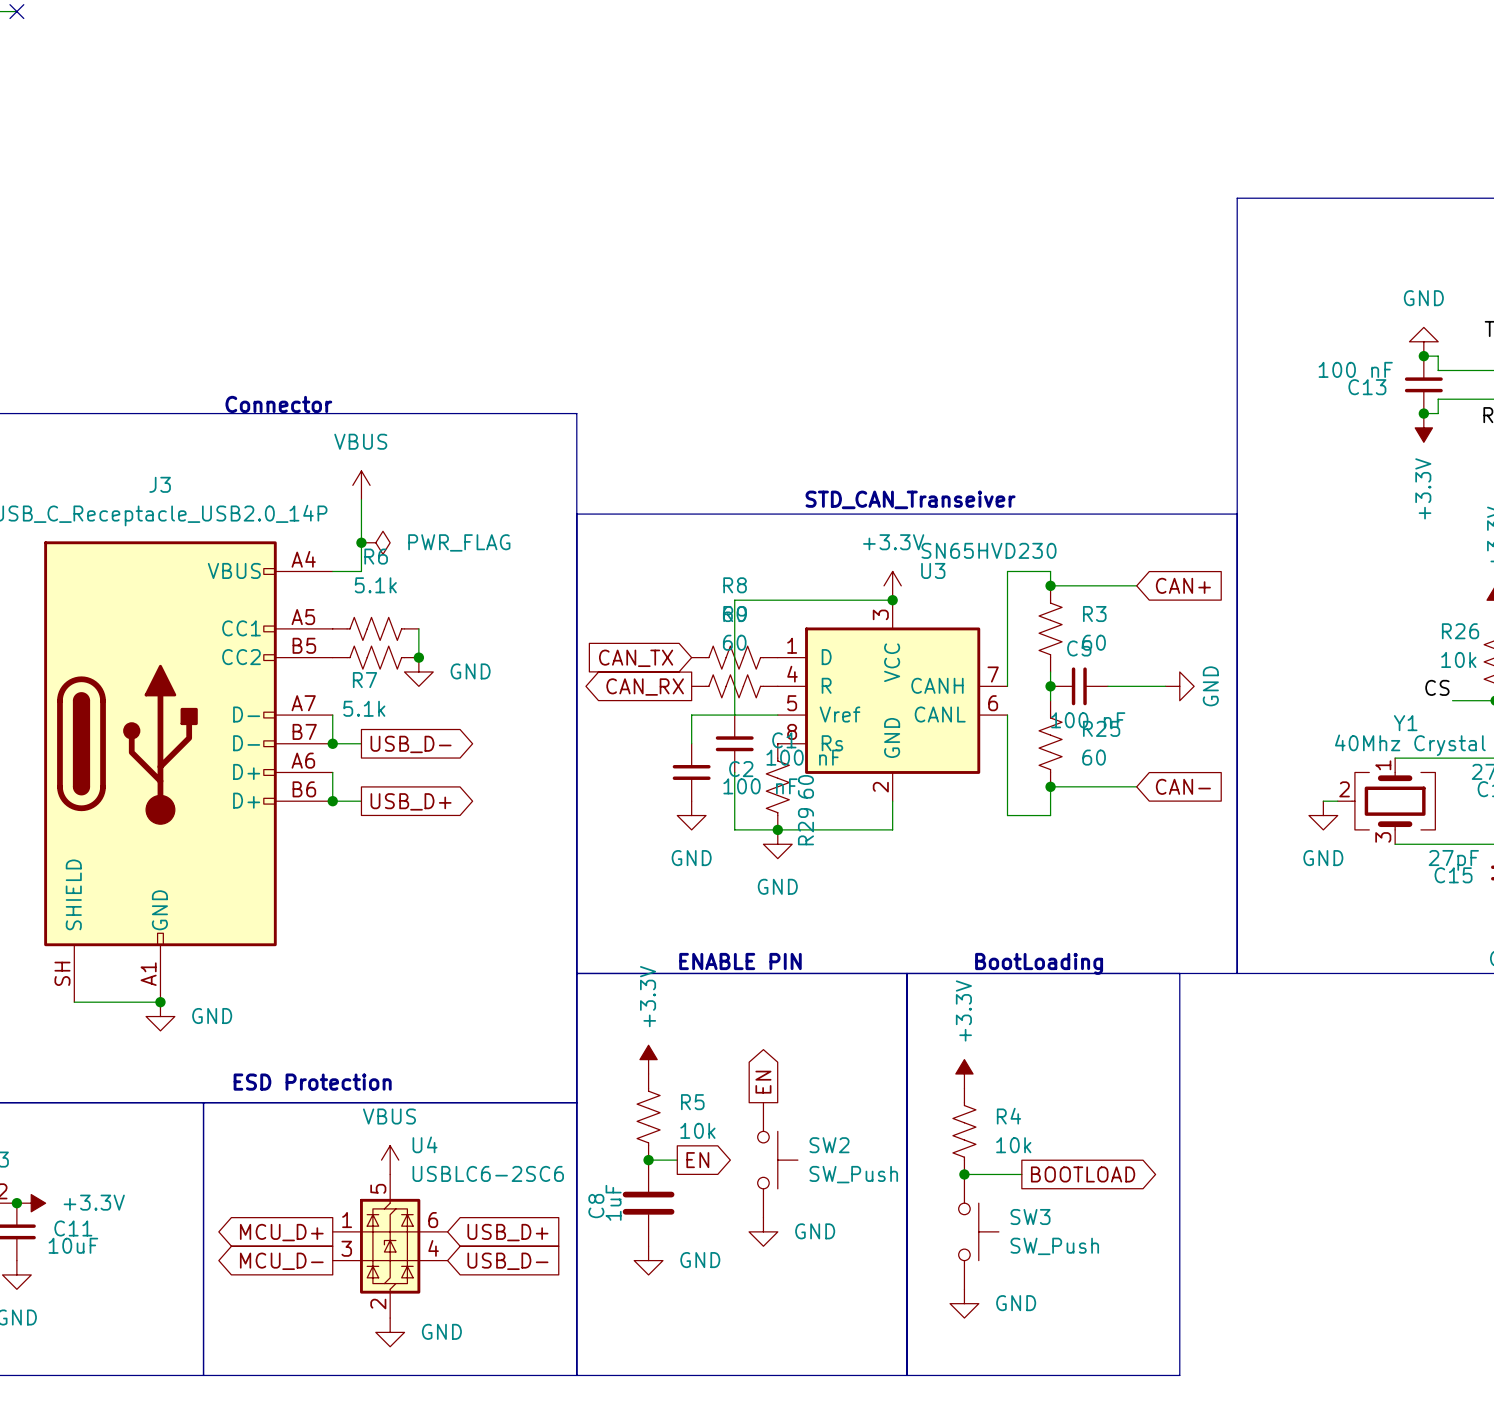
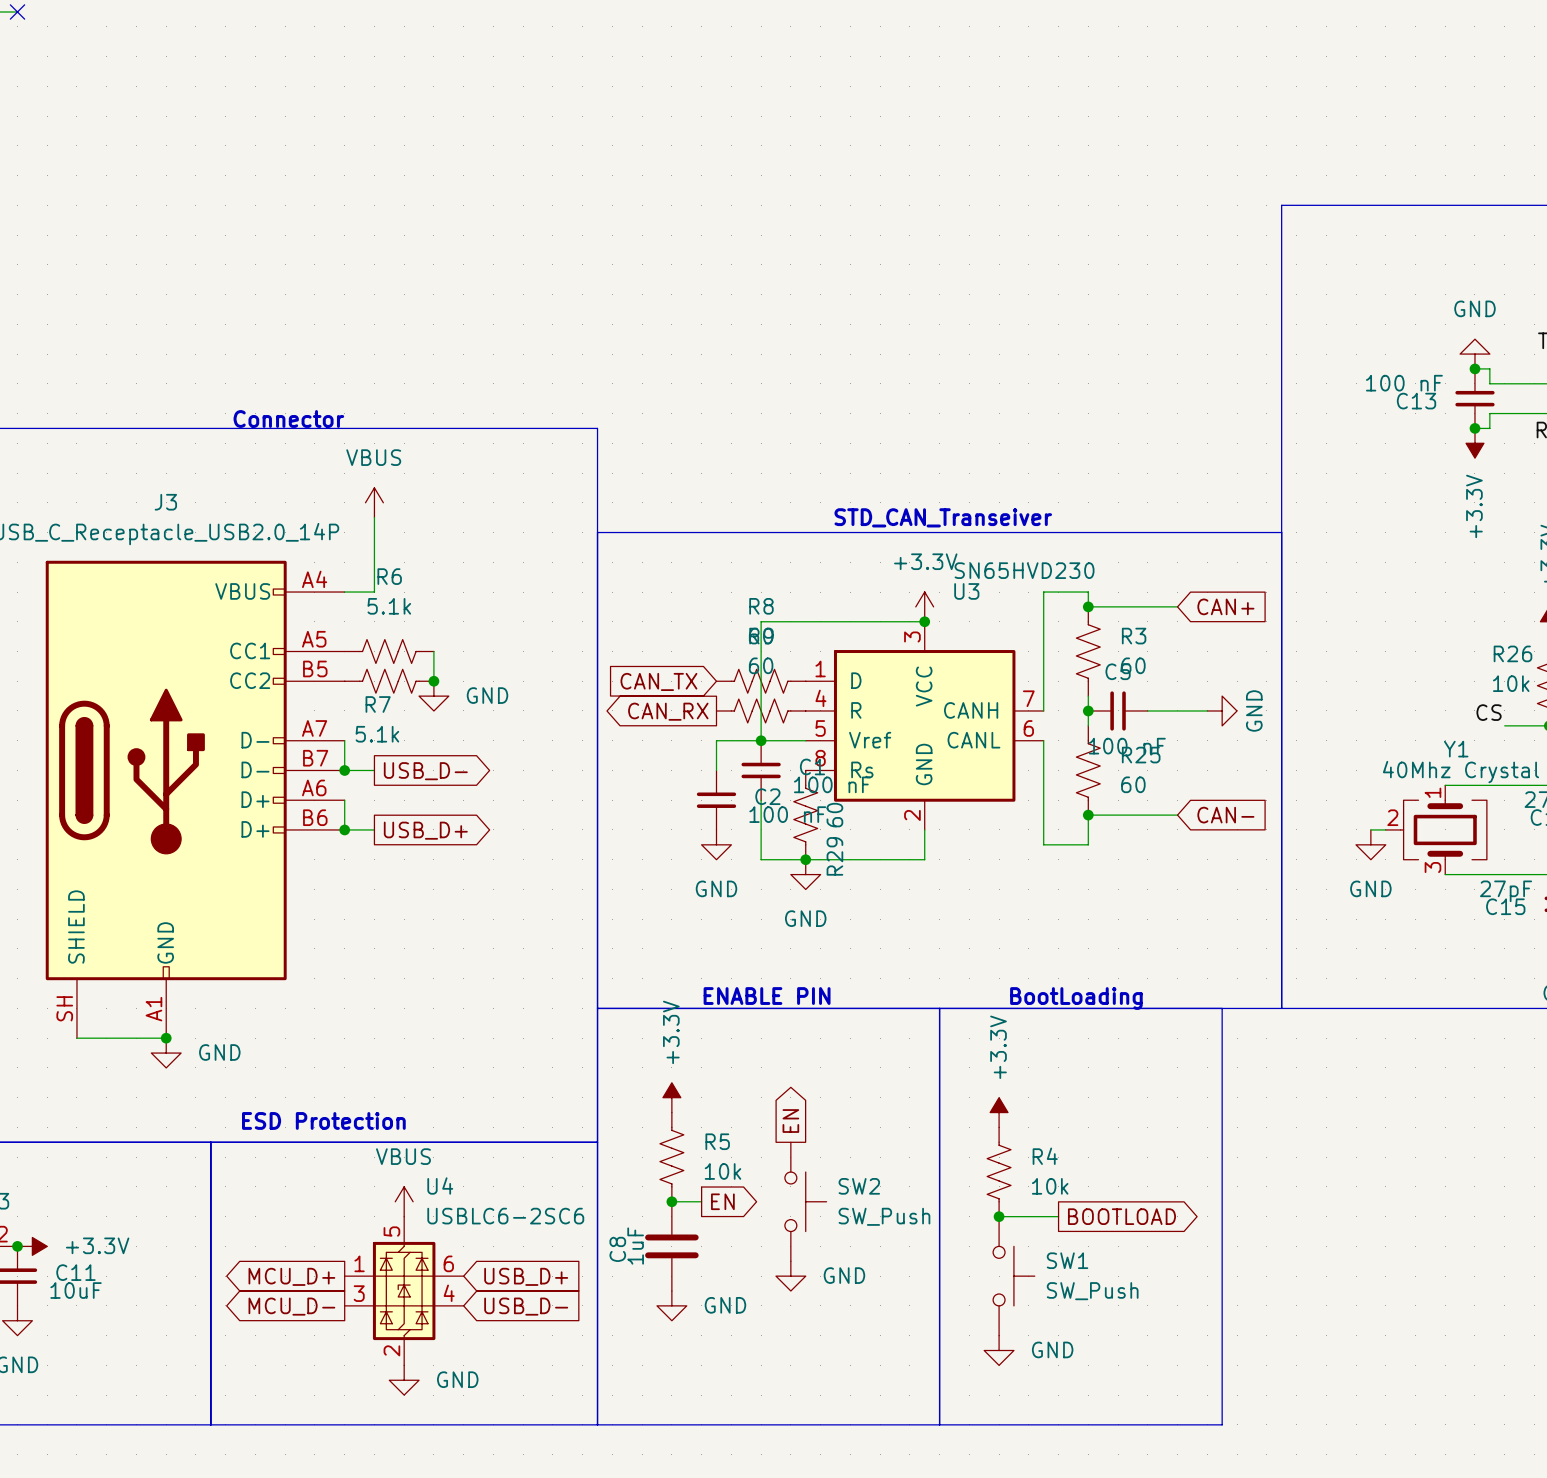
junction: (361, 542) -> none
power symbol: PWR_FLAG (375, 542) -> none
junction: none -> (761, 740)
SW3 name: SW3 (1030, 1217) -> SW1 (1067, 1260)

